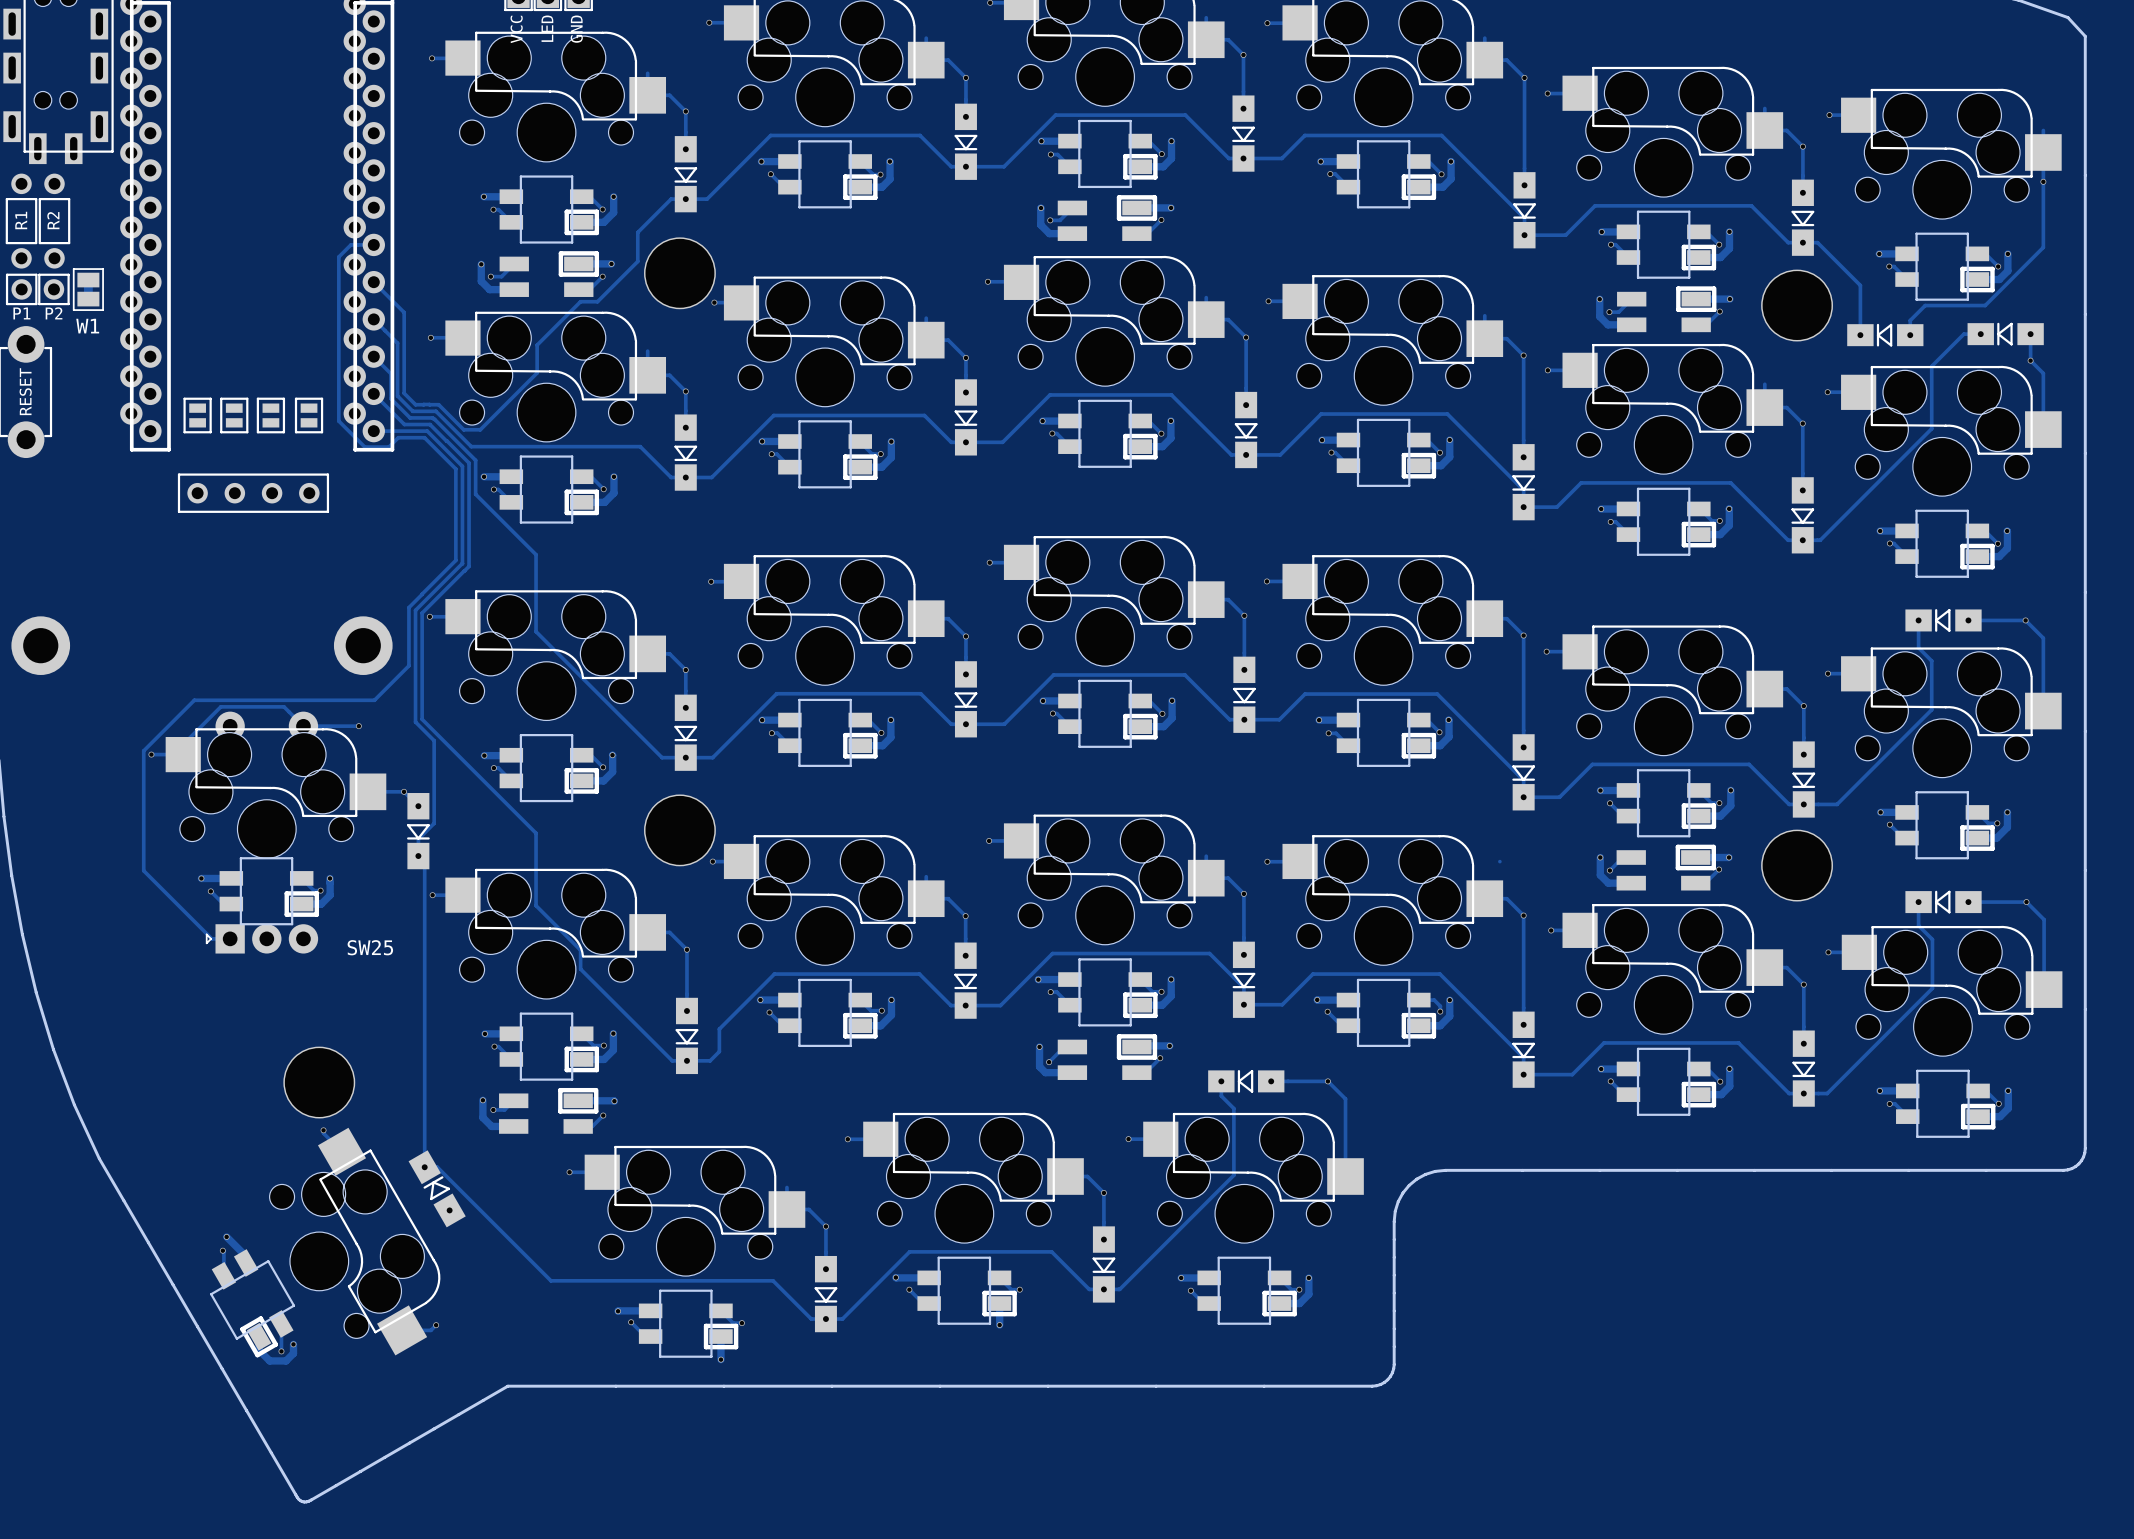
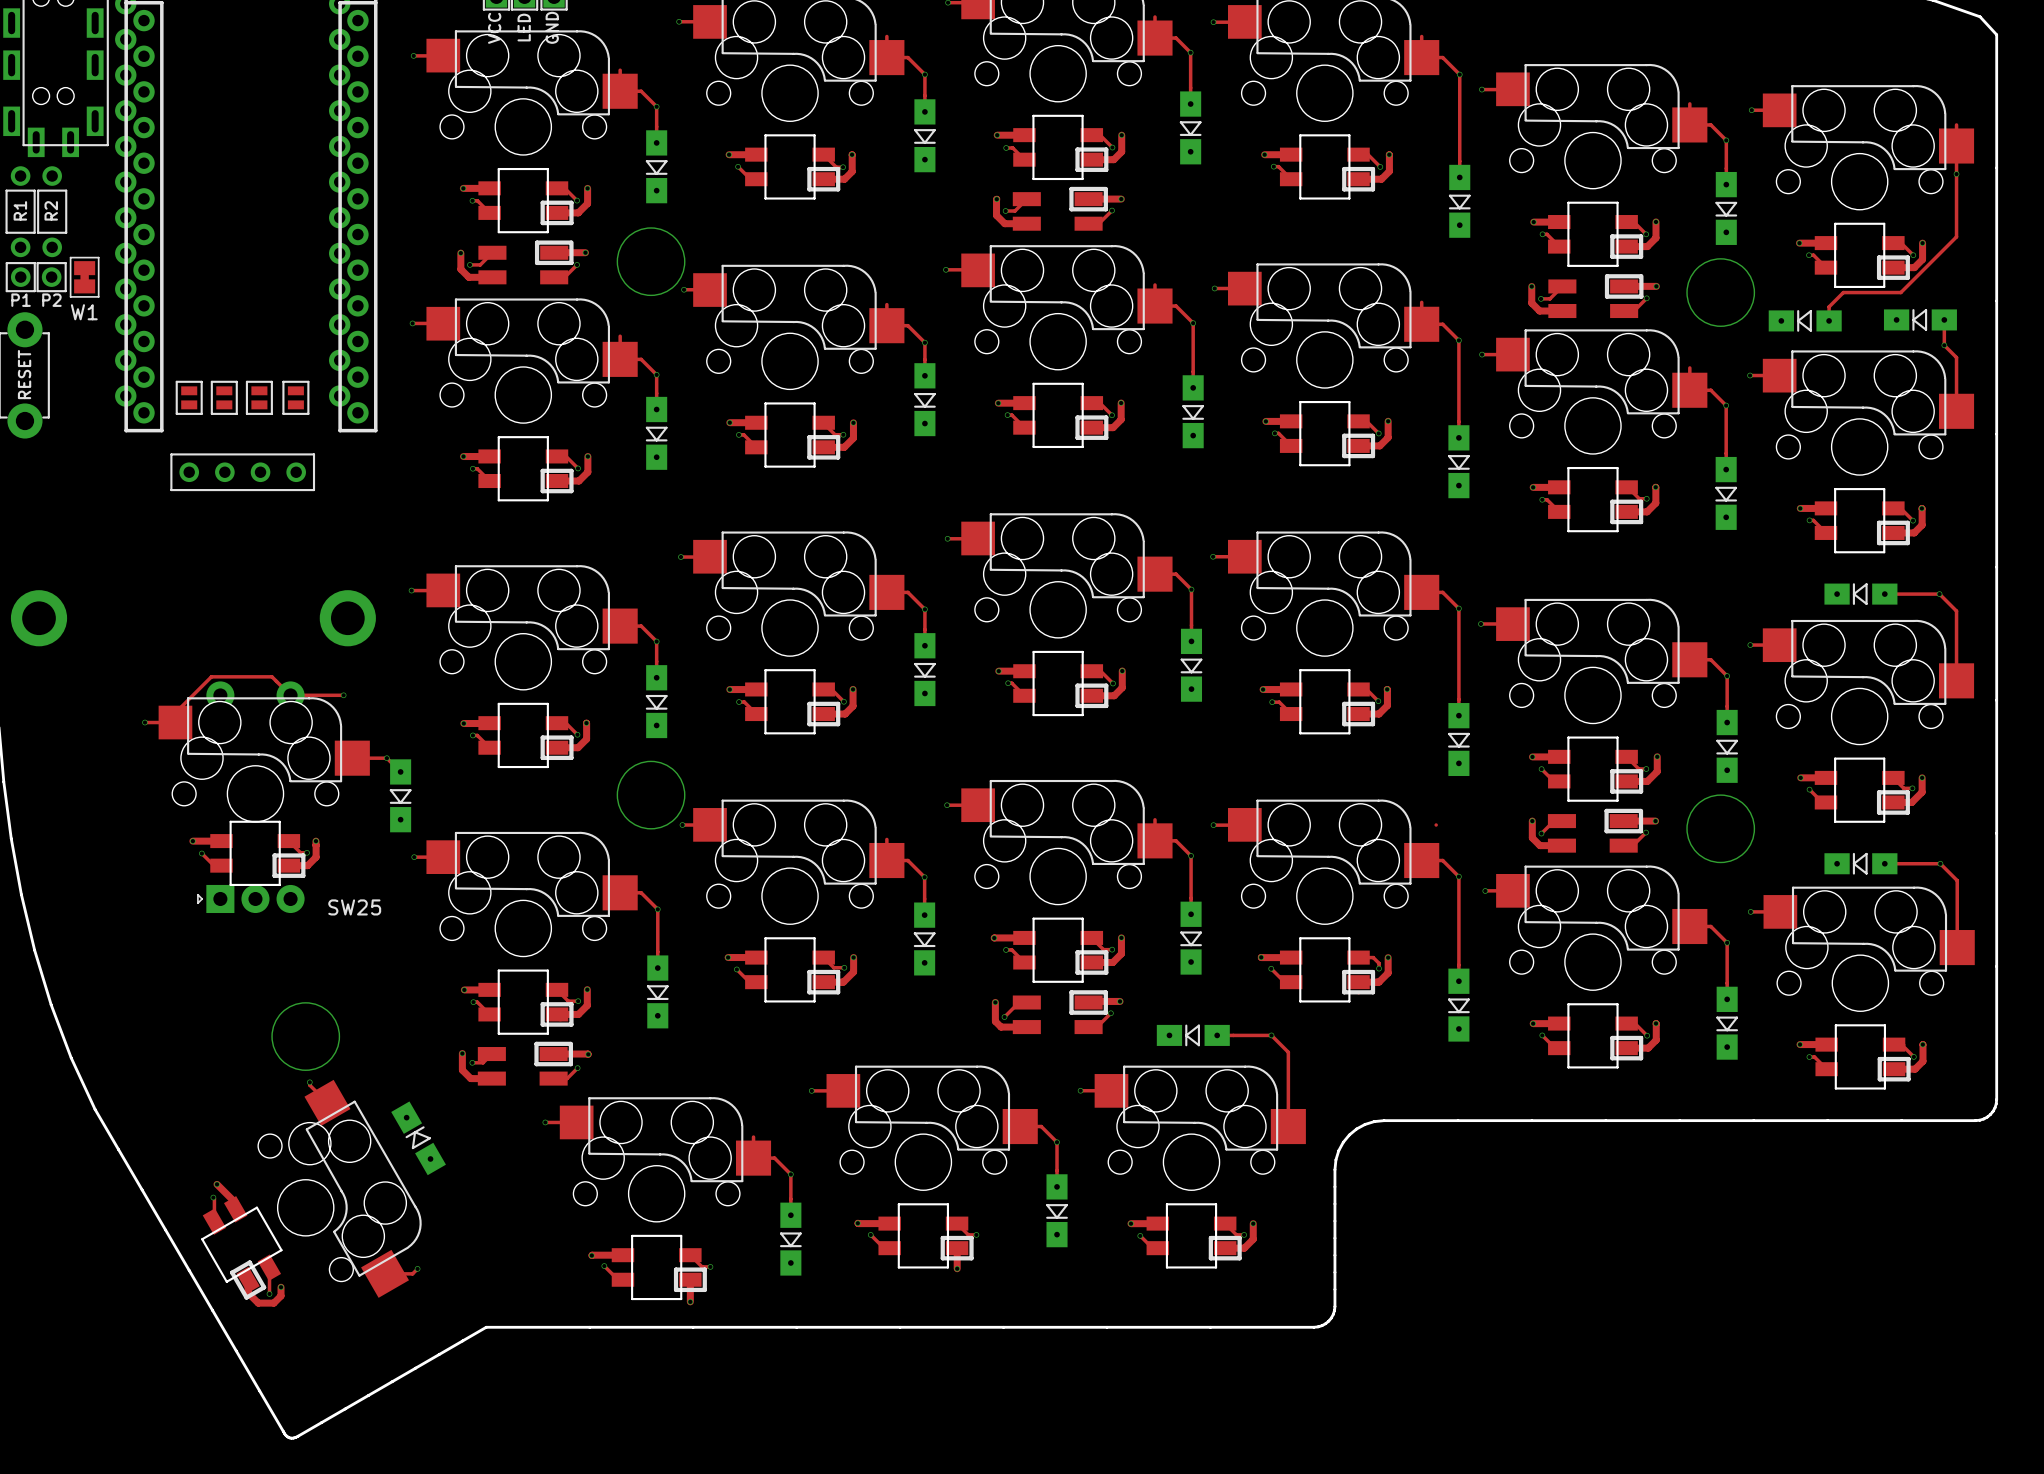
track: (373, 244) (350, 244) (338, 256) (338, 421) (364, 447) (388, 447) (398, 437) (424, 437) (455, 469) (455, 560) (408, 607) (408, 665) (374, 700) (194, 700) (143, 750) (143, 870) (211, 938) (230, 938) -> none
track: (373, 282) (404, 312) (404, 393) (415, 404) (438, 404) (463, 429) (480, 429) (537, 372) (537, 345) (580, 301) (597, 301) (637, 261) (637, 232) (671, 199) (707, 199) (770, 135) (920, 135) (951, 166) (1004, 166) (1055, 115) (1185, 115) (1228, 158) (1281, 158) (1304, 135) (1441, 135) (1524, 218) (1524, 235) (1565, 235) (1595, 205) (1751, 205) (1788, 242) (1817, 242) (1860, 285) (1860, 335) -> none
track: (373, 319) (397, 343) (397, 396) (412, 411) (435, 411) (471, 446) (640, 446) (671, 477) (711, 477) (773, 415) (924, 415) (951, 442) (1002, 442) (1049, 394) (1171, 394) (1231, 454) (1280, 454) (1321, 414) (1447, 414) (1523, 490) (1523, 507) (1556, 507) (1581, 482) (1730, 482) (1788, 540) (1820, 540) (1931, 428) (1931, 366) (1963, 334) (1980, 334) -> none
track: (373, 356) (390, 373) (390, 398) (410, 417) (432, 417) (475, 460) (475, 494) (536, 554) (536, 631) (662, 757) (712, 757) (776, 693) (920, 693) (951, 724) (1004, 724) (1053, 674) (1184, 674) (1229, 719) (1279, 719) (1305, 694) (1437, 694) (1523, 780) (1523, 797) (1559, 797) (1592, 764) (1749, 764) (1789, 804) (1837, 804) (1931, 709) (1931, 660) (1918, 647) (1918, 620) -> none
track: (373, 393) (404, 424) (430, 424) (469, 463) (469, 566) (464, 570) -> none
track: (373, 431) (427, 431) (462, 466) (462, 563) -> none
track: (462, 563) (415, 610) (415, 722) (434, 740) (434, 823) (418, 839) (418, 856) (424, 862) (424, 1167) (437, 1167) (550, 1280) (773, 1280) (811, 1319) (842, 1319) (909, 1251) (1051, 1251) (1089, 1289) (1119, 1289) (1233, 1175) (1233, 1108) (1221, 1096) (1221, 1081) -> none
track: (464, 570) (422, 613) (422, 719) (536, 833) (536, 905) (580, 950) (580, 969) (672, 1060) (710, 1060) (719, 1051) (719, 1029) (774, 974) (919, 974) (951, 1005) (1000, 1005) (1052, 953) (1209, 953) (1243, 987) (1243, 1004) (1282, 1004) (1312, 974) (1439, 974) (1523, 1057) (1523, 1074) (1572, 1074) (1603, 1042) (1738, 1042) (1789, 1093) (1827, 1093) (1932, 988) (1932, 939) (1918, 925) (1918, 902) -> none

